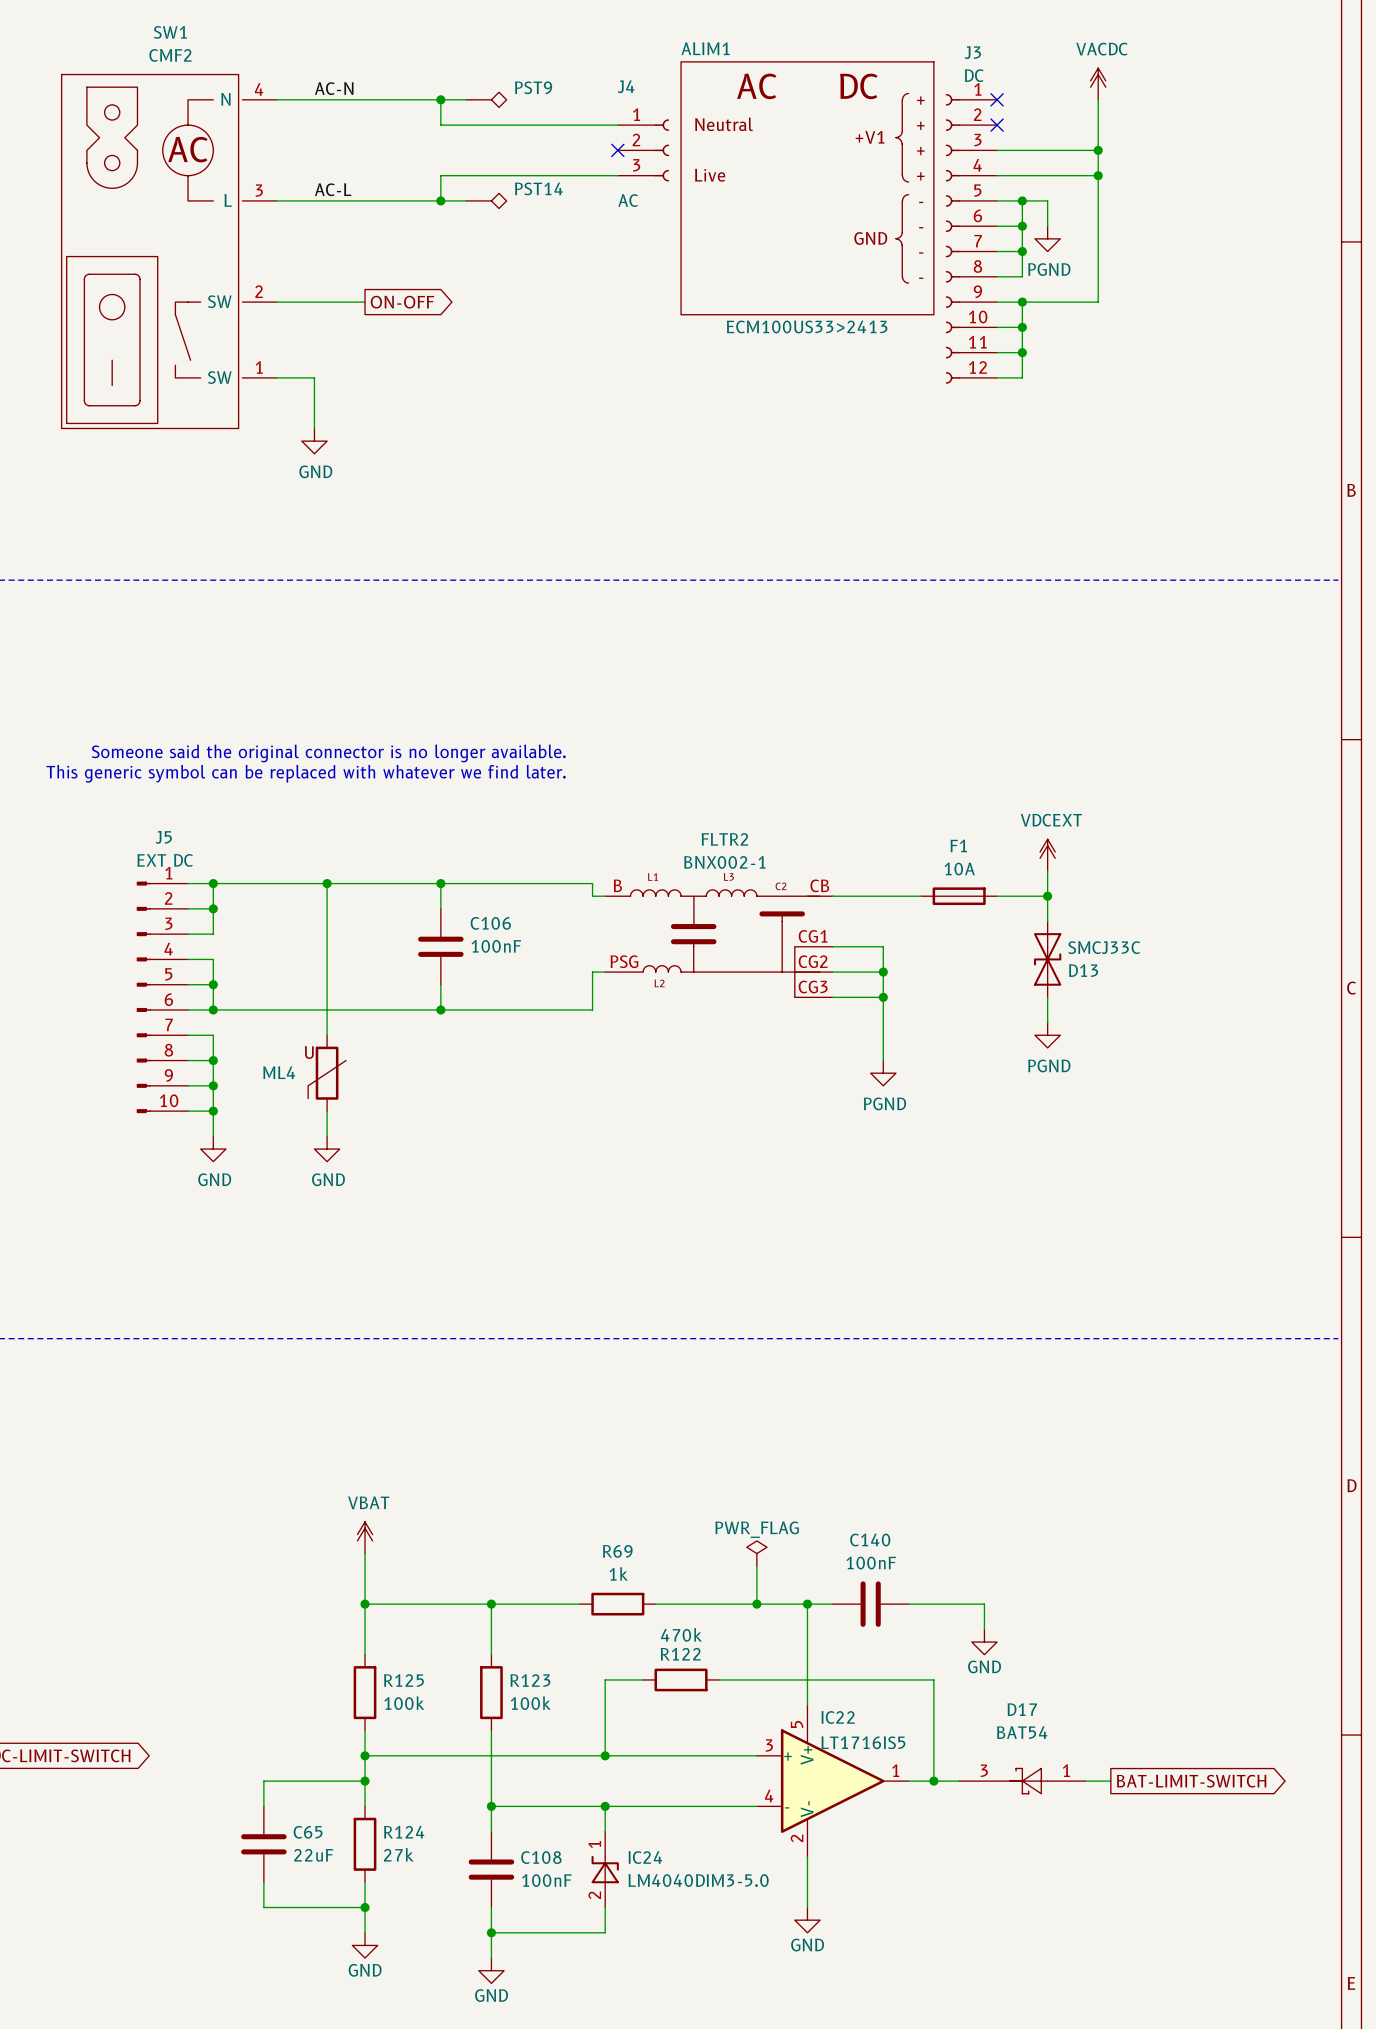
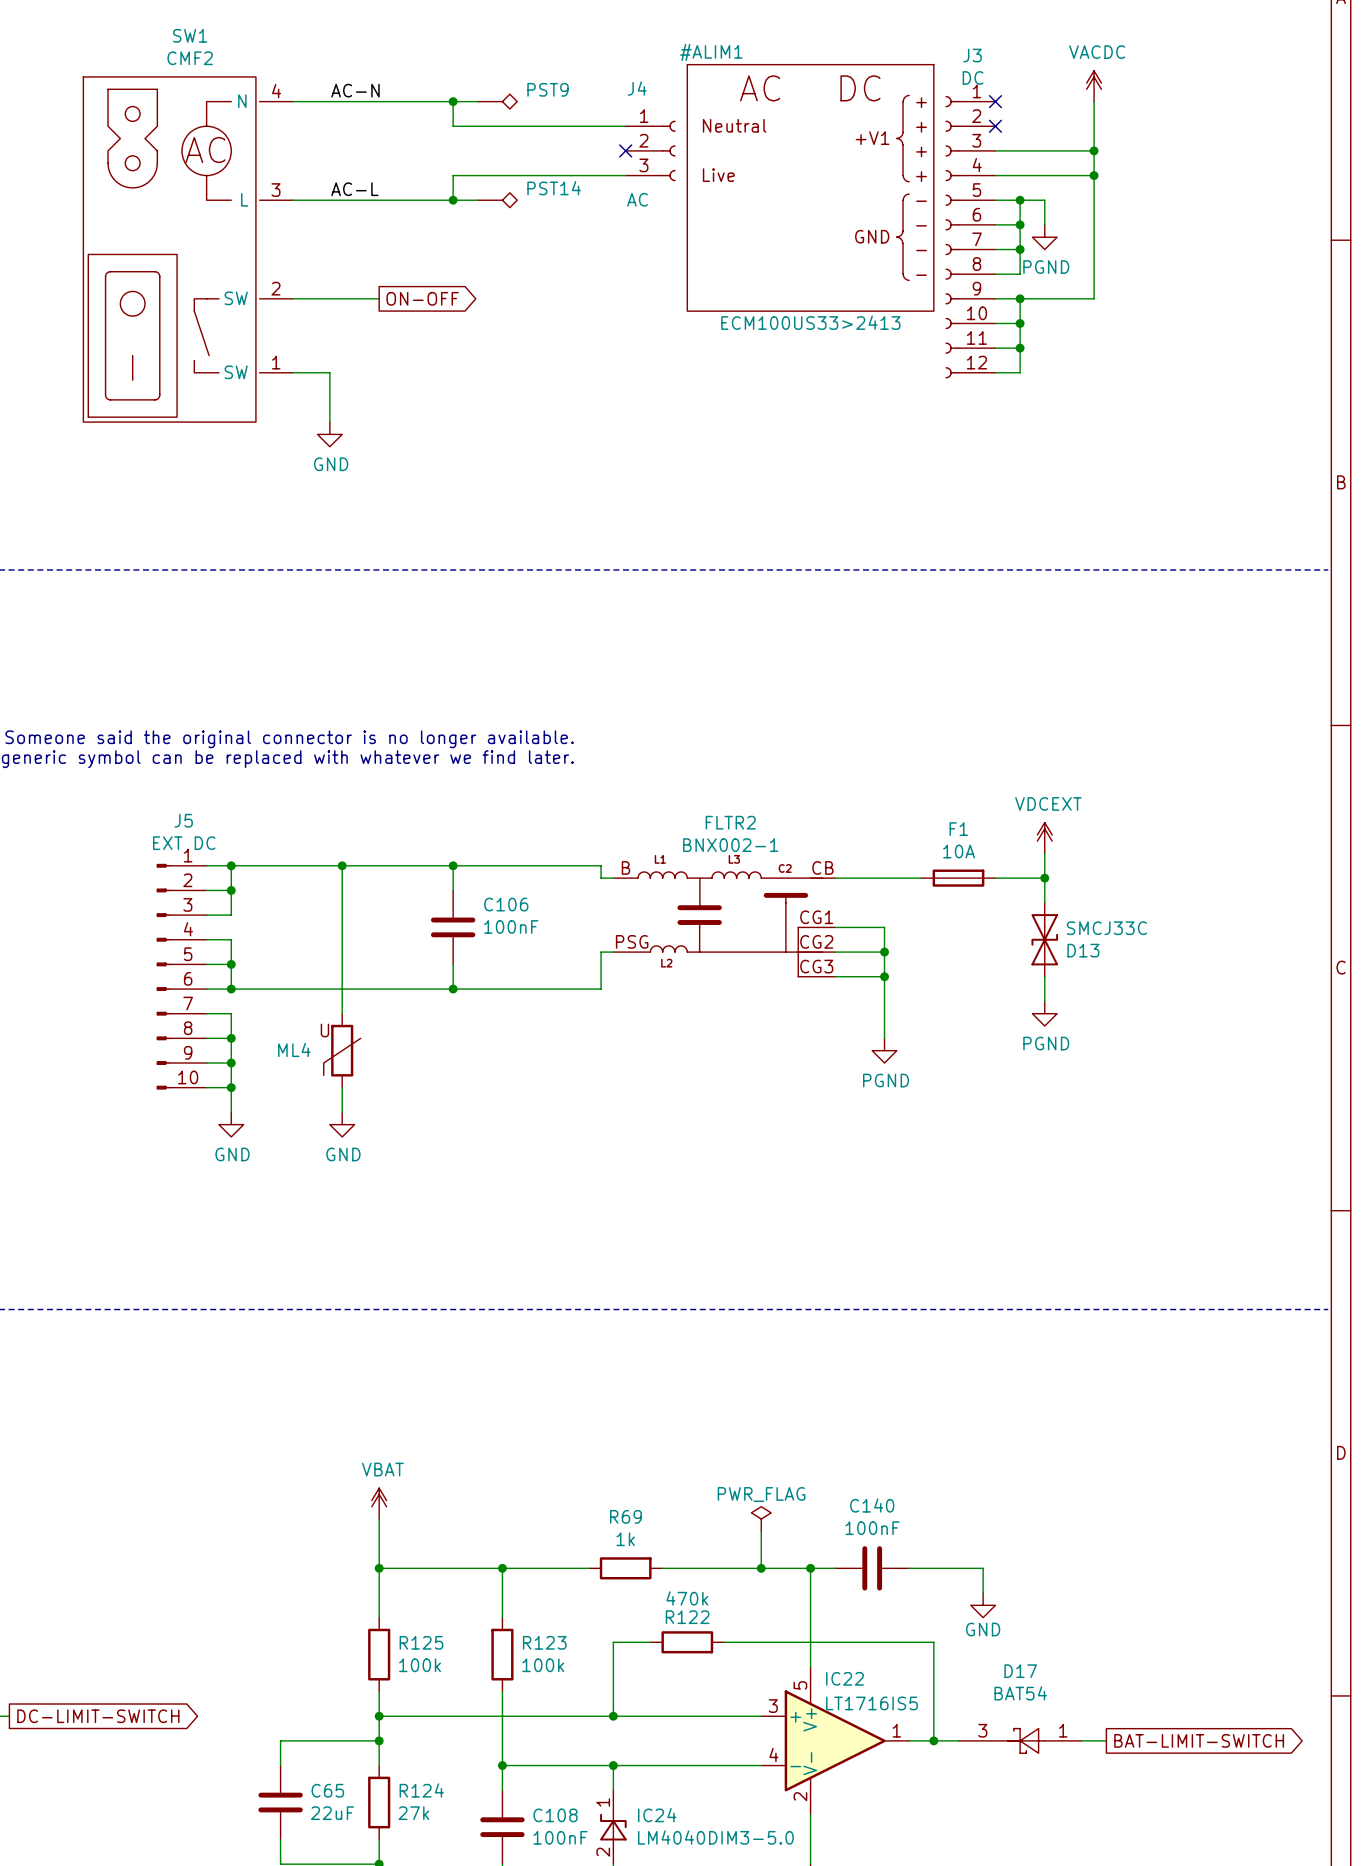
ALIM1: ECM100US33>2413 (807, 188) -> none
#ALIM1: none -> ECM100US33>2413 (810, 187)

